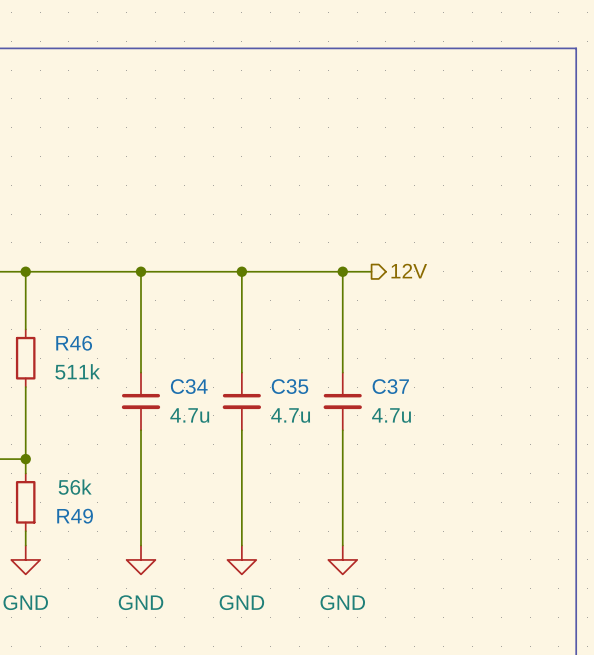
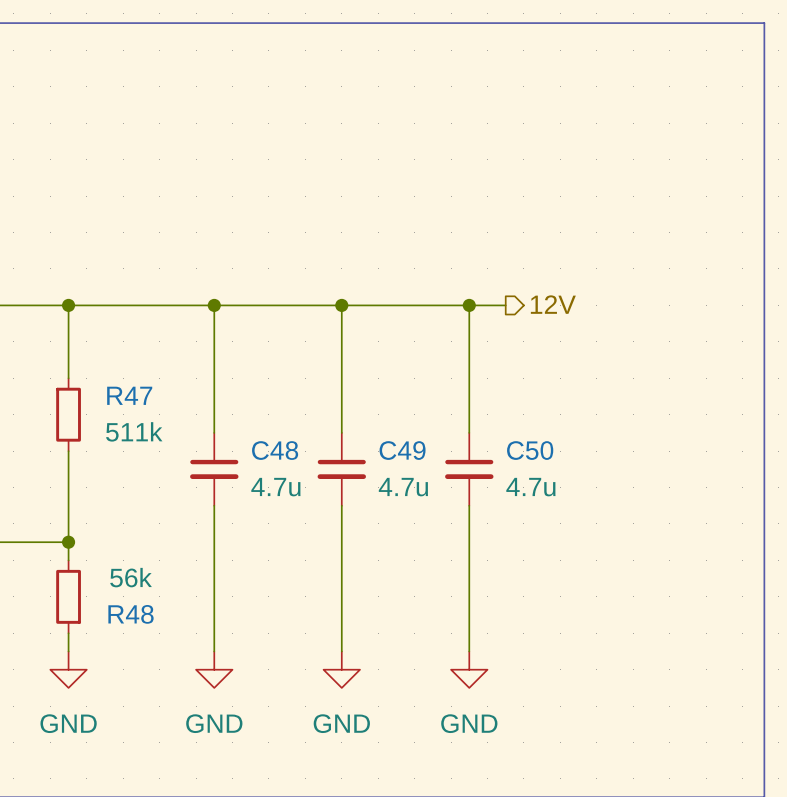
R46 name: R46 (74, 343) -> R47 (129, 395)
C34 name: C34 (189, 386) -> C48 (275, 450)
C35 name: C35 (290, 386) -> C49 (402, 450)
C37 name: C37 (390, 386) -> C50 (530, 450)
R49 name: R49 (75, 516) -> R48 (131, 614)

